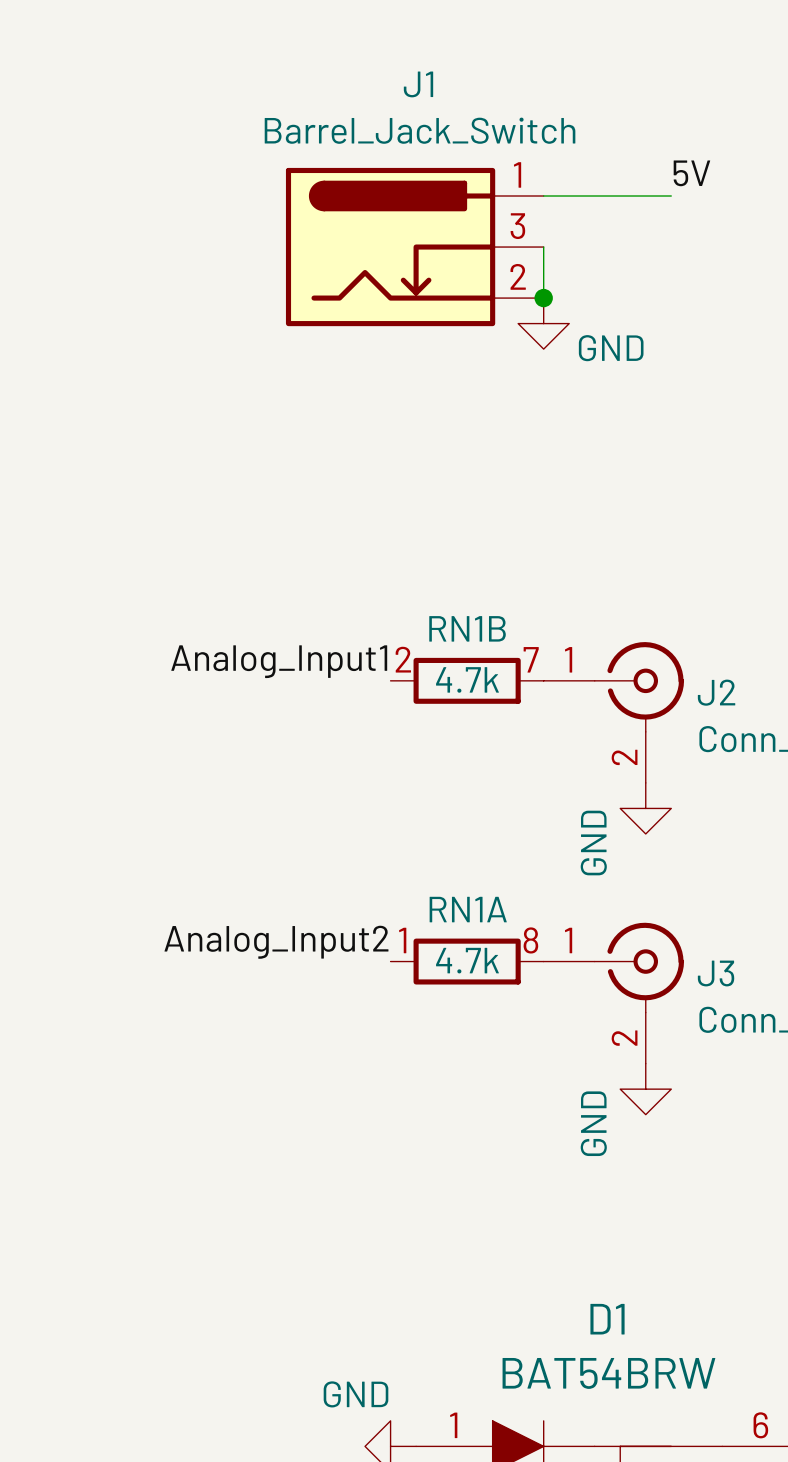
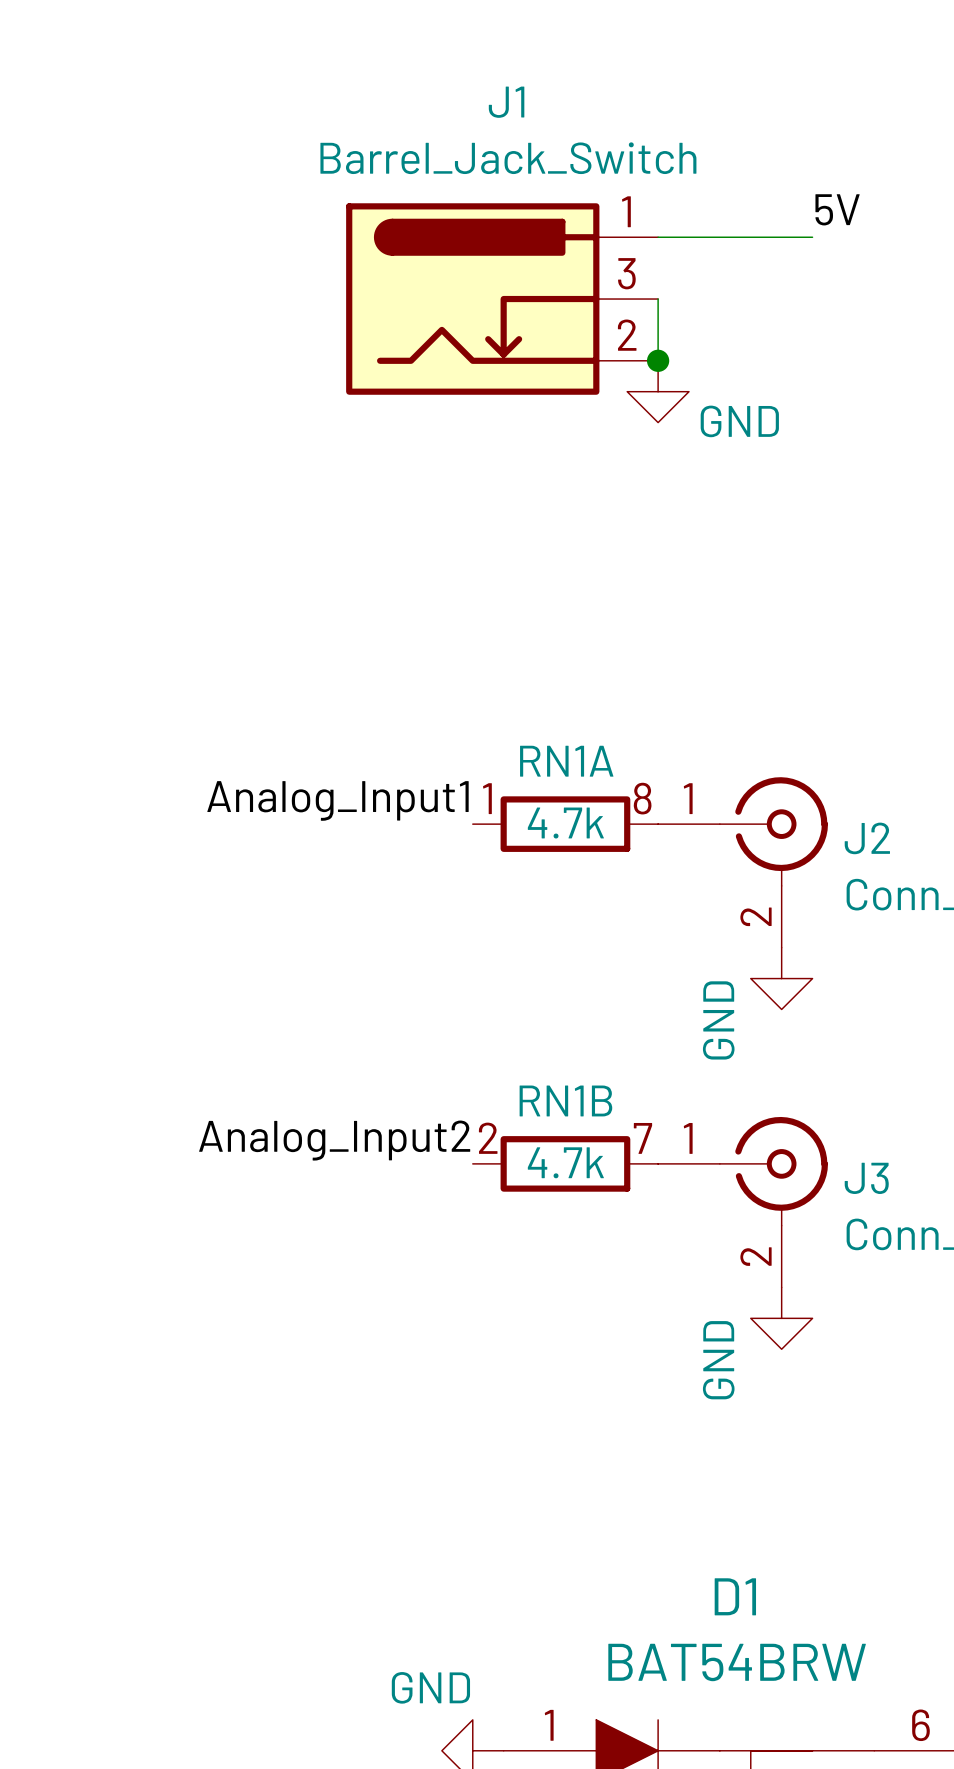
RN1B position: (467, 680) -> (565, 1163)
RN1A position: (467, 961) -> (565, 824)

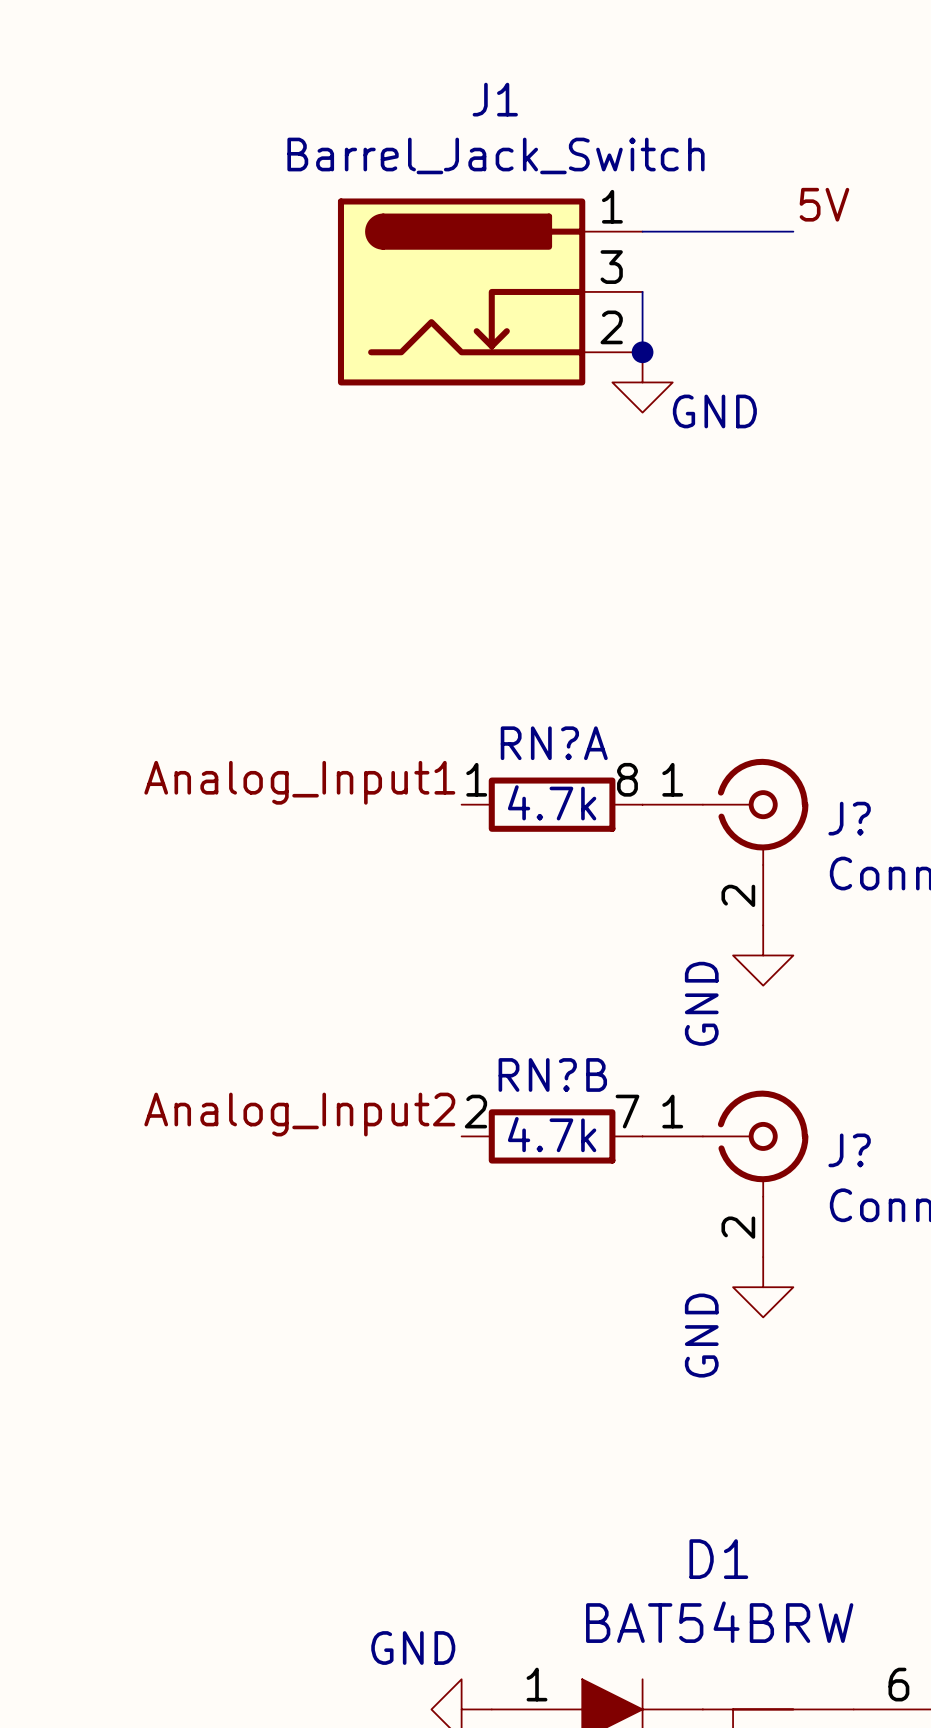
RN1A name: RN1A (566, 761) -> RN?A (554, 743)
J2 name: J2 (867, 838) -> J? (849, 818)
RN1B name: RN1B (565, 1100) -> RN?B (552, 1074)
J3 name: J3 (866, 1178) -> J? (849, 1150)

